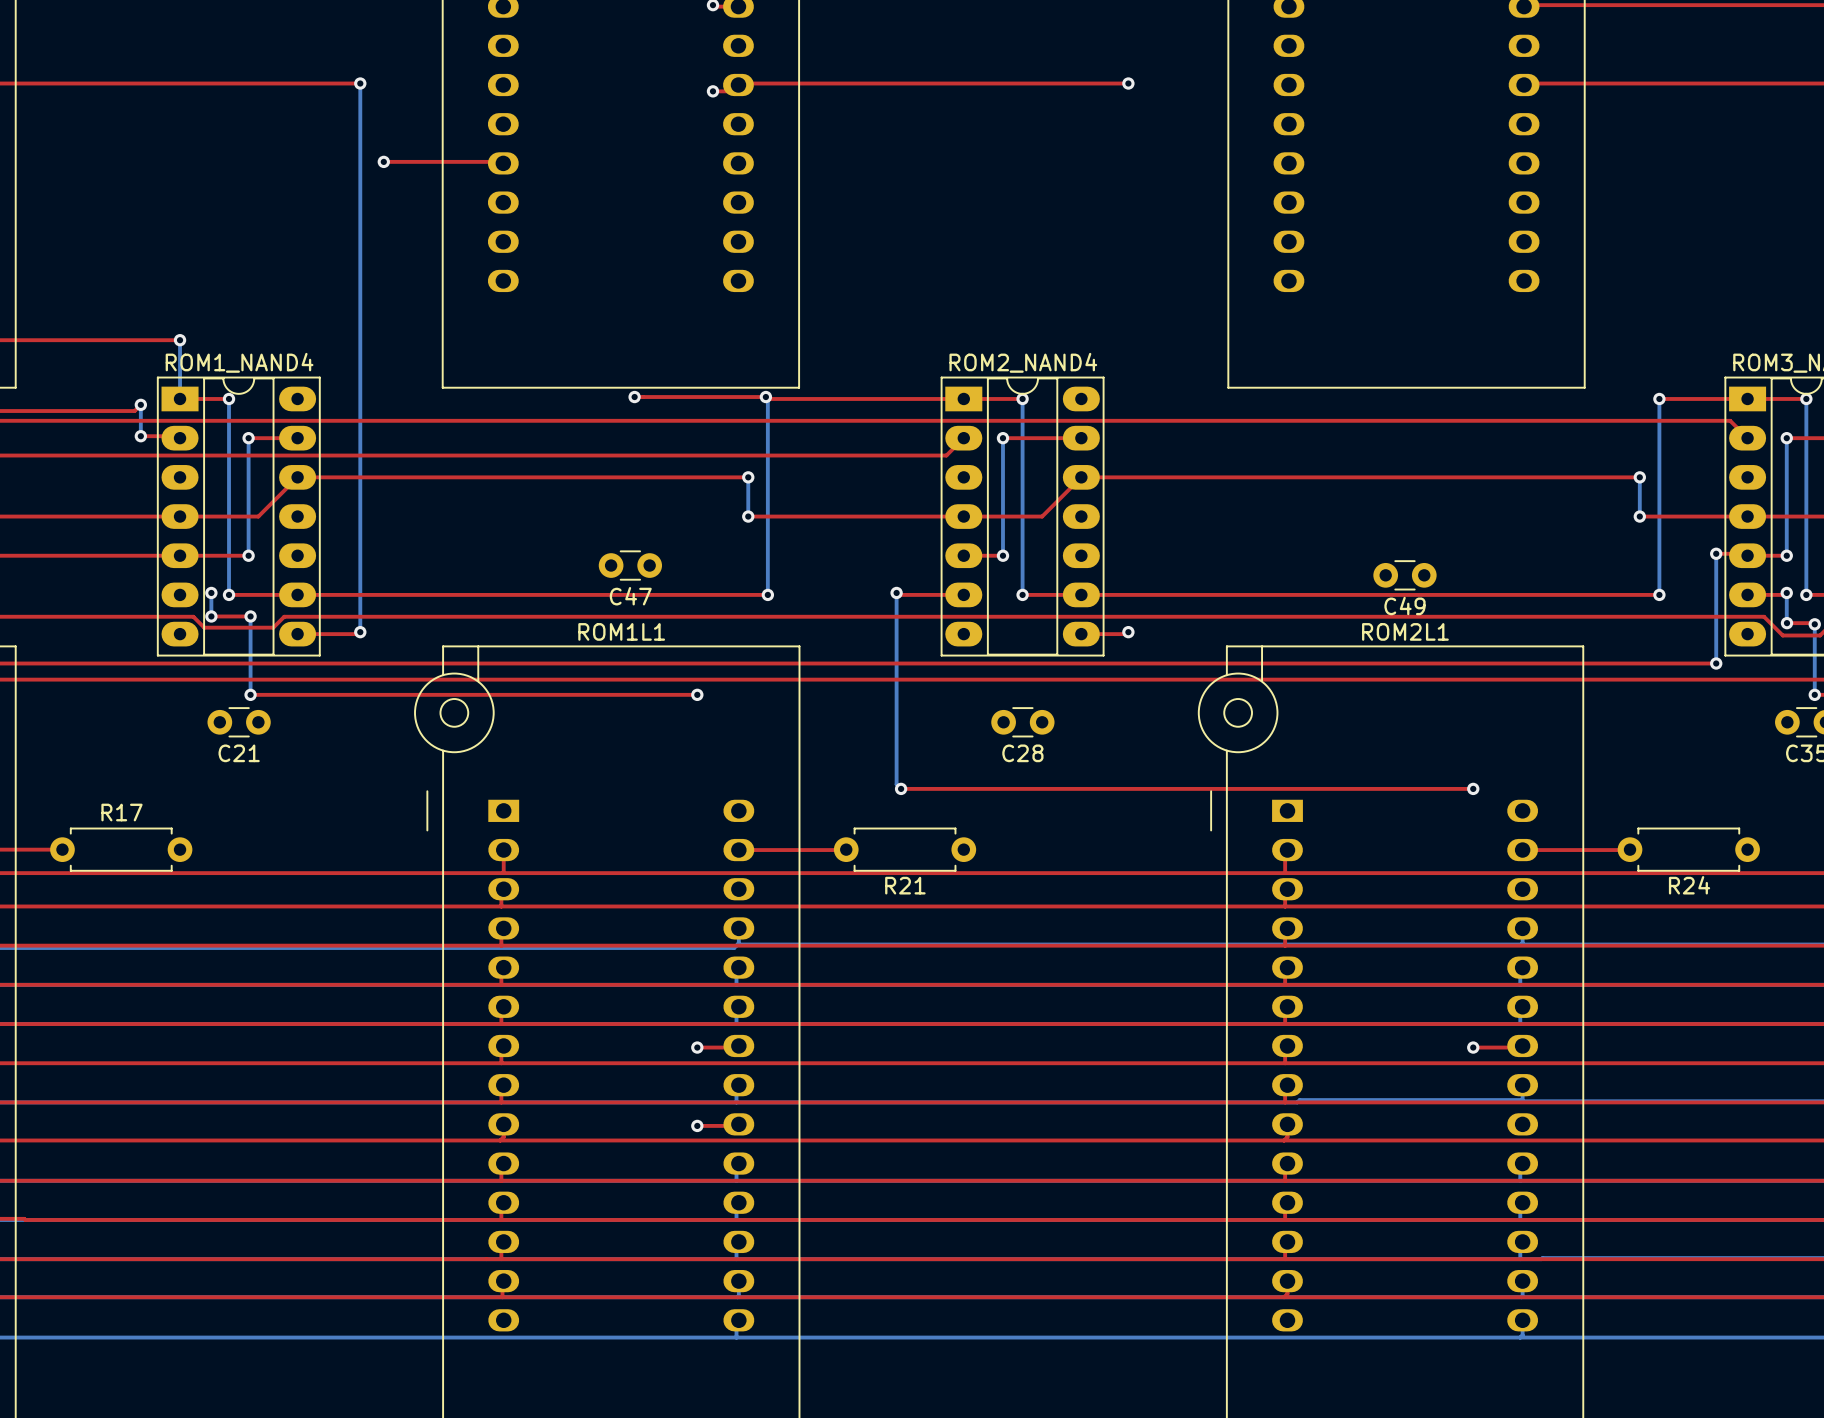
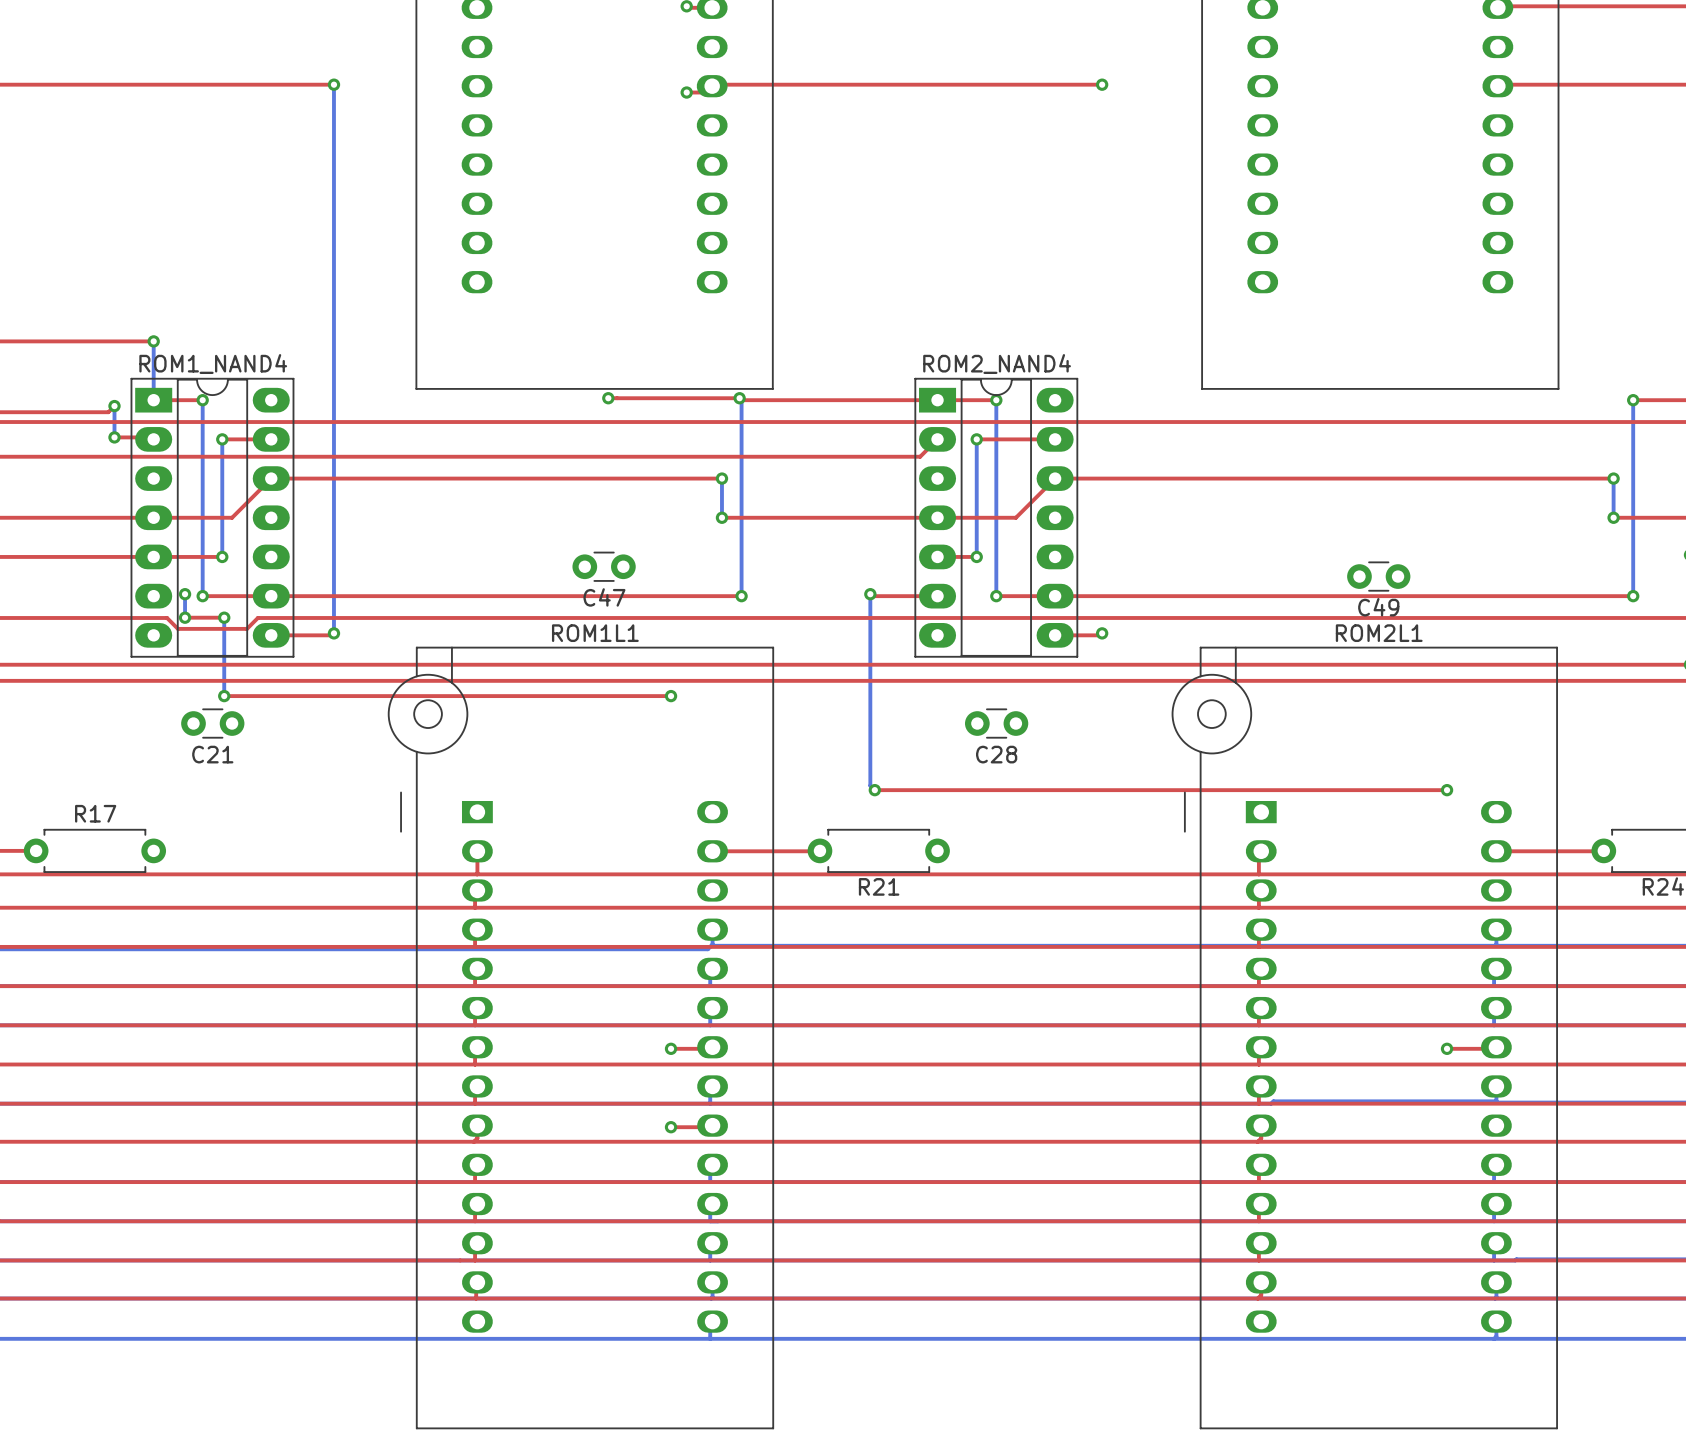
top track: (383, 161) (503, 163) -> none
via: (383, 161) -> none

